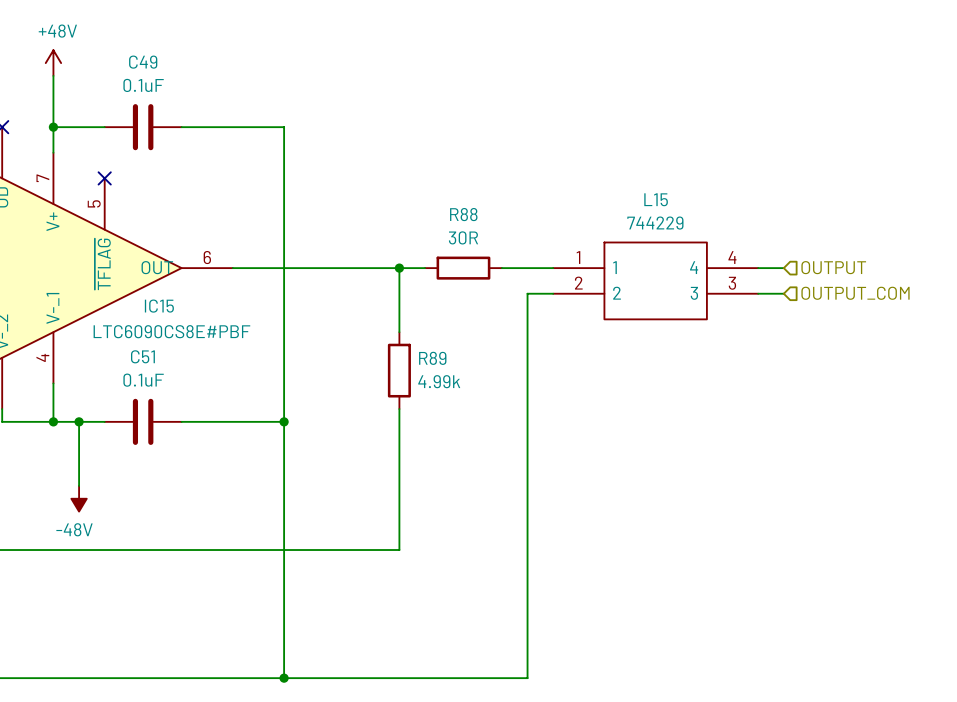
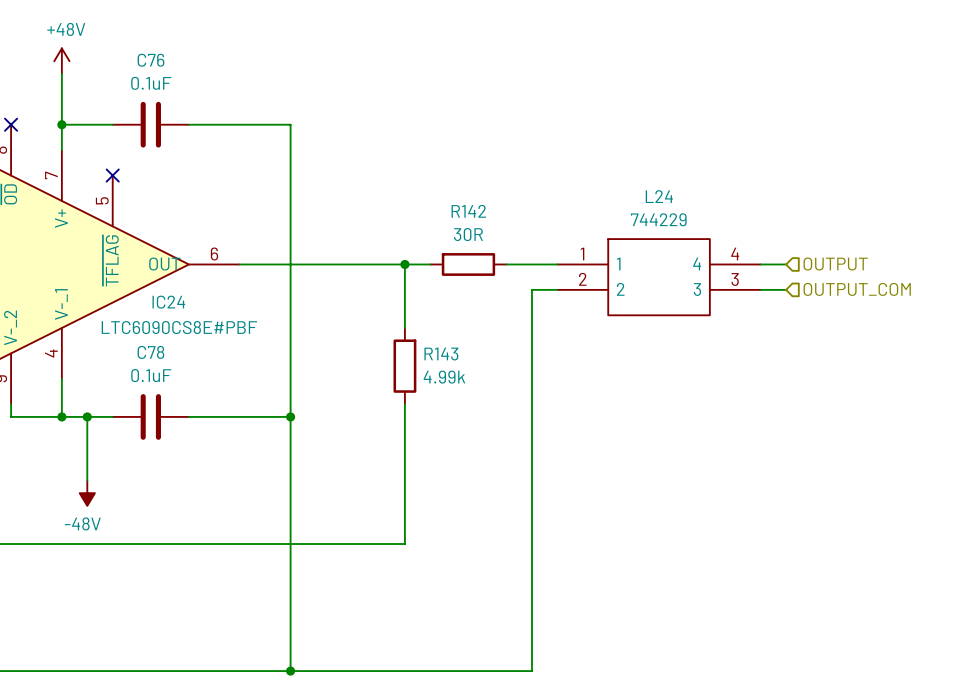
C49 name: C49 (143, 62) -> C76 (151, 60)
L15 name: L15 (656, 199) -> L24 (659, 196)
R88 name: R88 (463, 214) -> R142 (468, 211)
IC15 name: IC15 (159, 306) -> IC24 (168, 302)
C51 name: C51 (142, 356) -> C78 (150, 352)
R89 name: R89 (432, 358) -> R143 (441, 354)

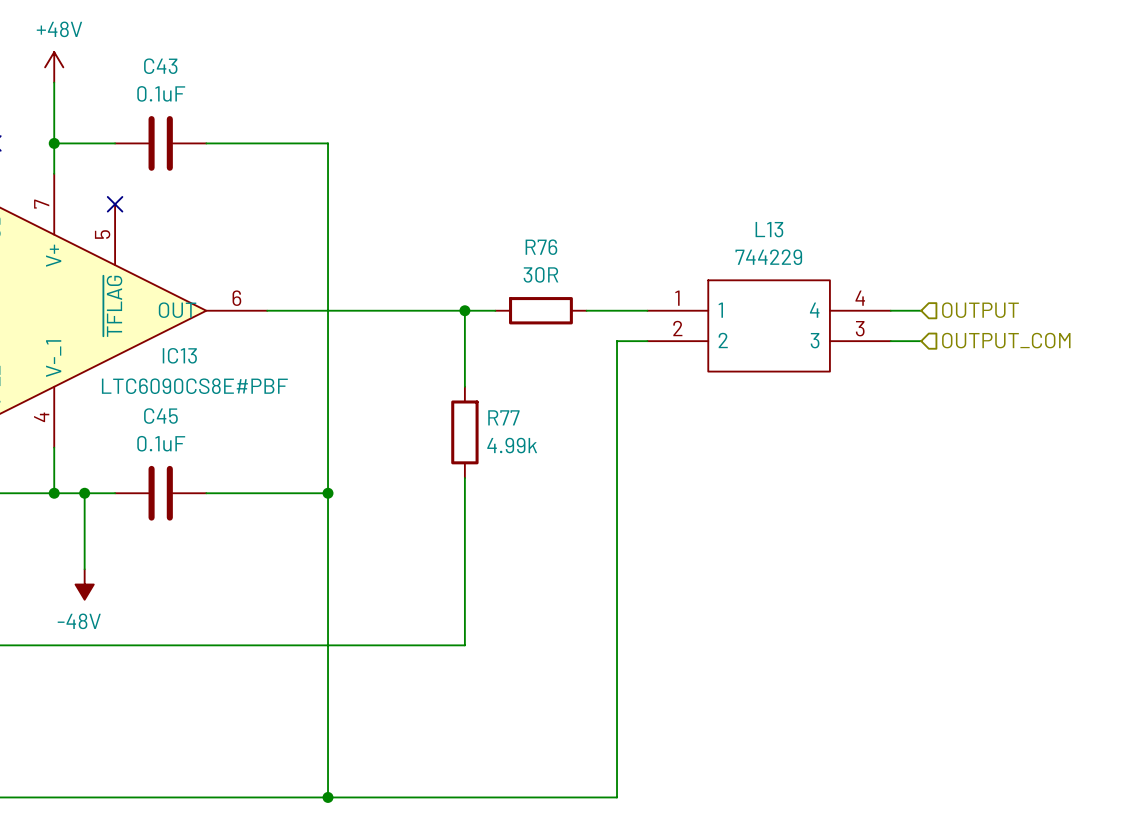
C76 name: C76 (151, 60) -> C43 (160, 66)
L24 name: L24 (659, 196) -> L13 (769, 229)
R142 name: R142 (468, 211) -> R76 (541, 247)
IC24 name: IC24 (168, 302) -> IC13 (179, 355)
C78 name: C78 (150, 352) -> C45 (160, 416)
R143 name: R143 (441, 354) -> R77 (503, 417)

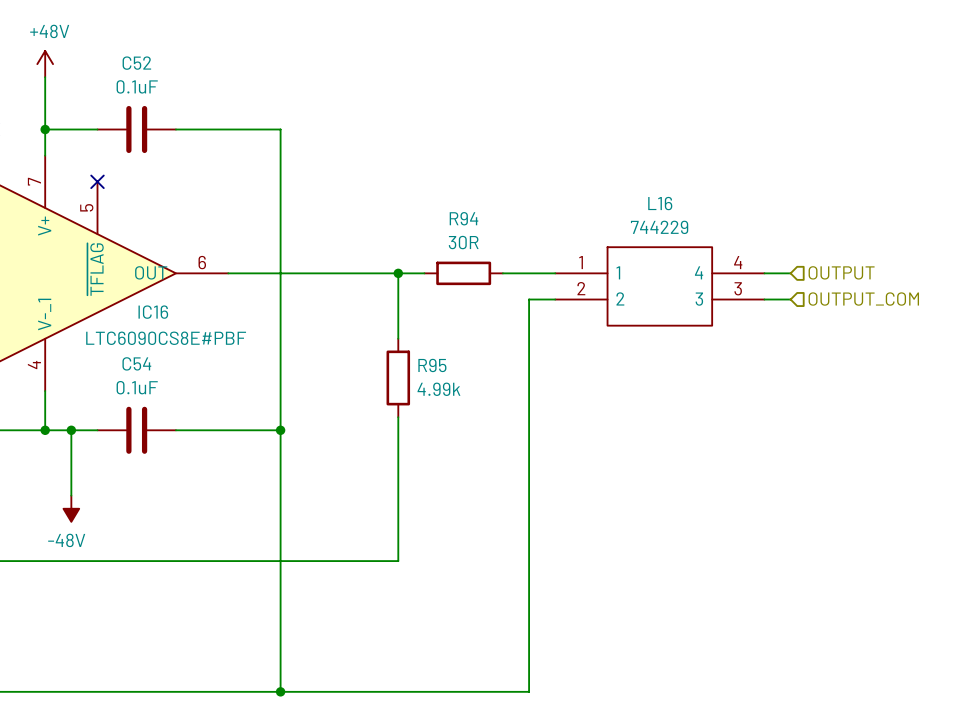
C43 name: C43 (160, 66) -> C52 (136, 63)
L13 name: L13 (769, 229) -> L16 (660, 203)
R76 name: R76 (541, 247) -> R94 (463, 218)
IC13 name: IC13 (179, 355) -> IC16 (153, 312)
C45 name: C45 (160, 416) -> C54 (136, 363)
R77 name: R77 (503, 417) -> R95 (432, 365)

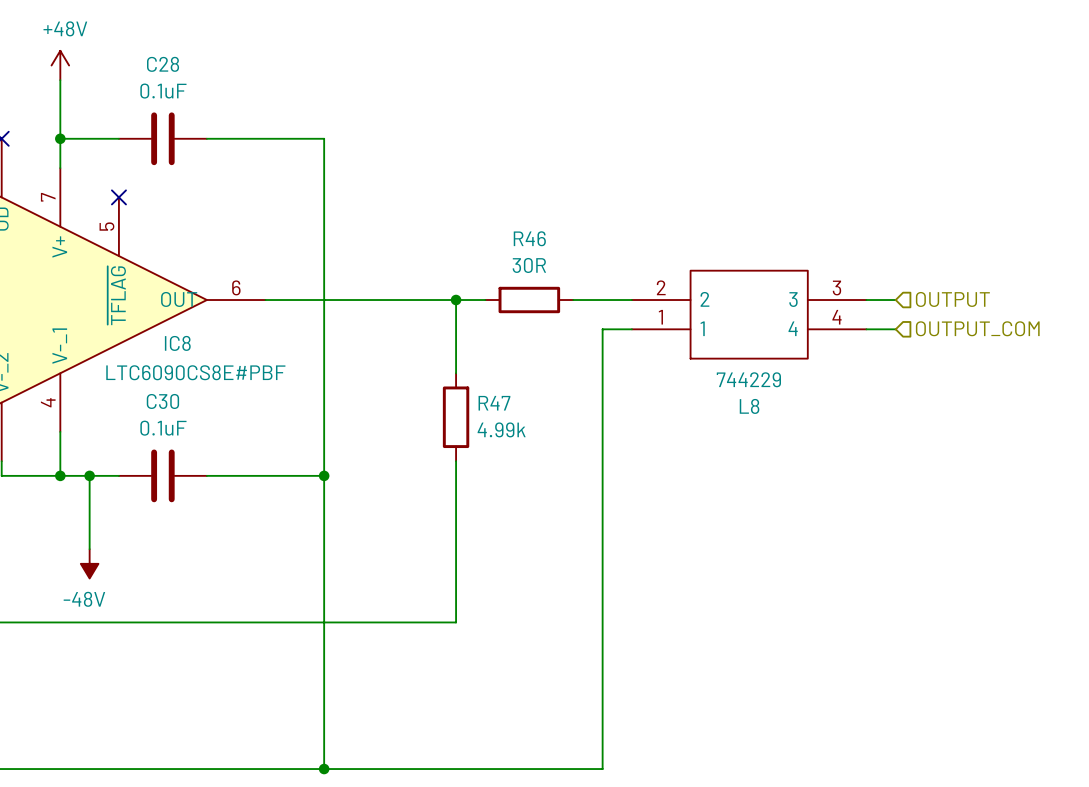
C52 name: C52 (136, 63) -> C28 (163, 64)
L16 name: L16 (660, 203) -> L8 (749, 406)
R94 name: R94 (463, 218) -> R46 (529, 238)
L16 flip: as is (659, 286) -> up-down (749, 314)
IC16 name: IC16 (153, 312) -> IC8 (177, 343)
C54 name: C54 (136, 363) -> C30 (162, 401)
R95 name: R95 (432, 365) -> R47 (494, 403)

